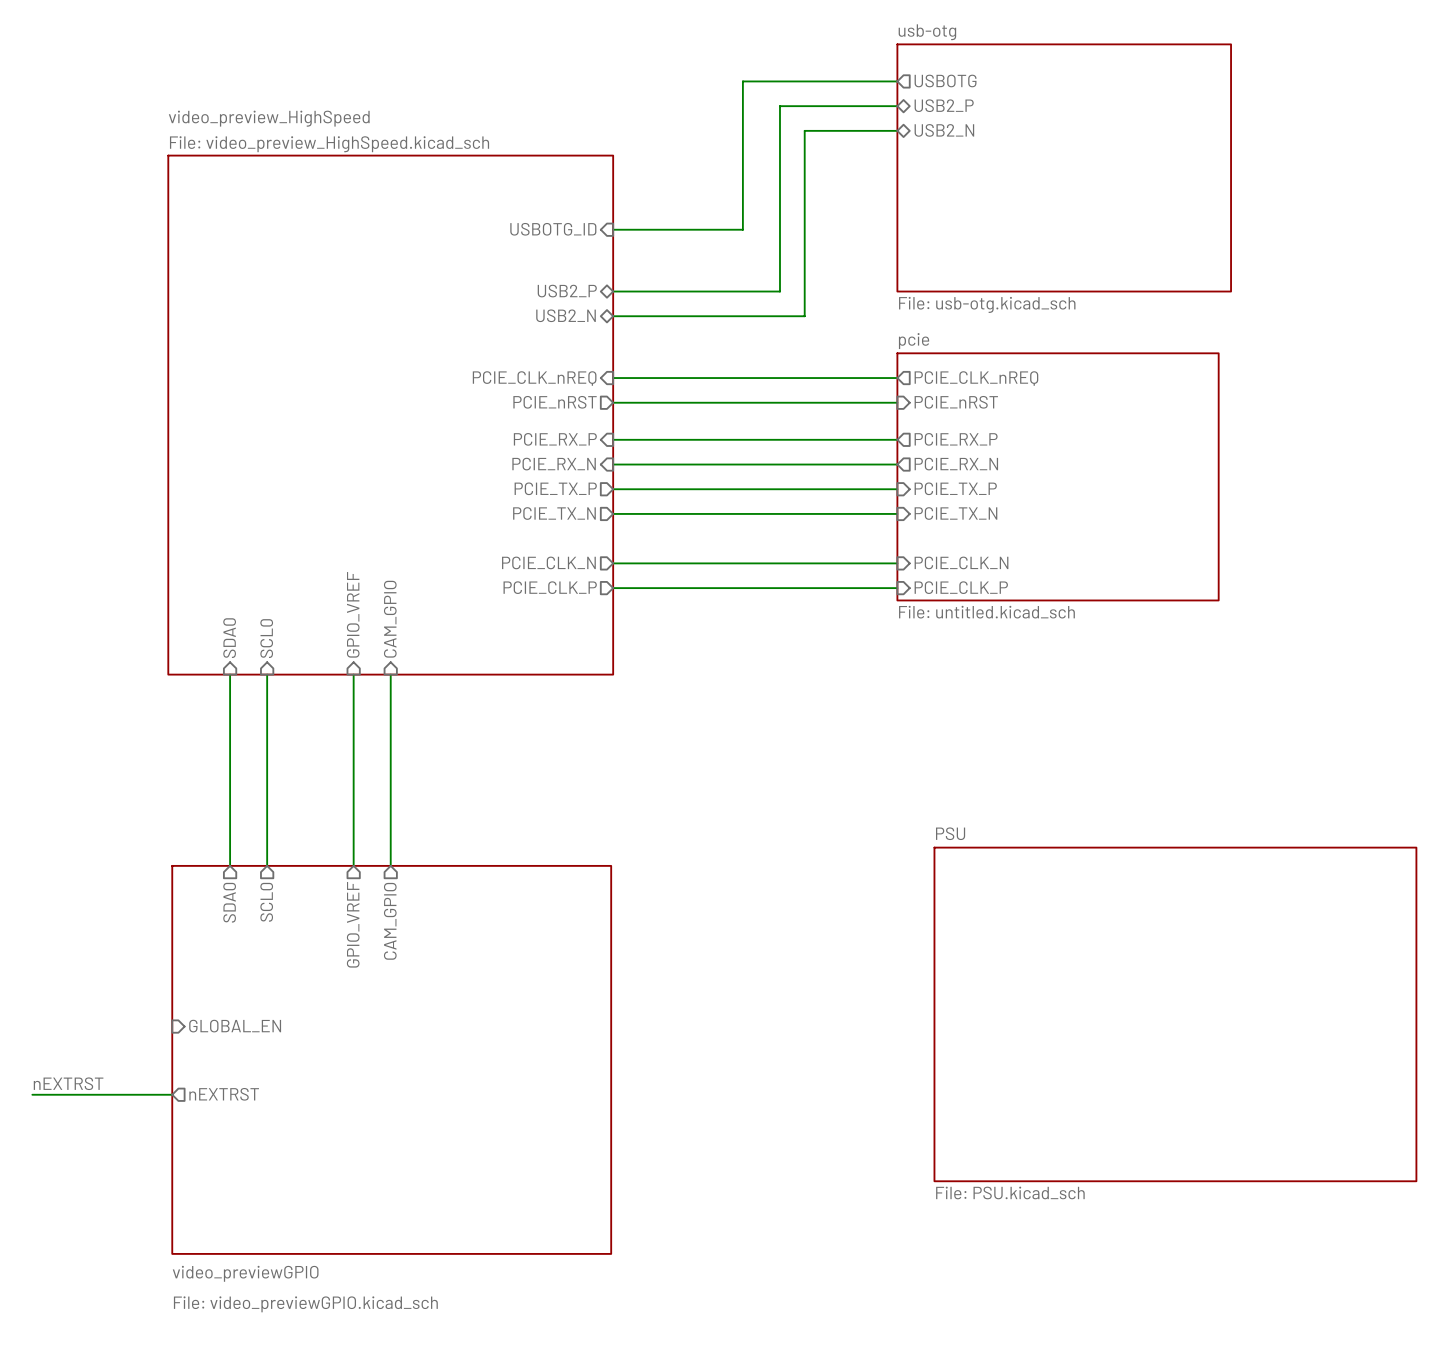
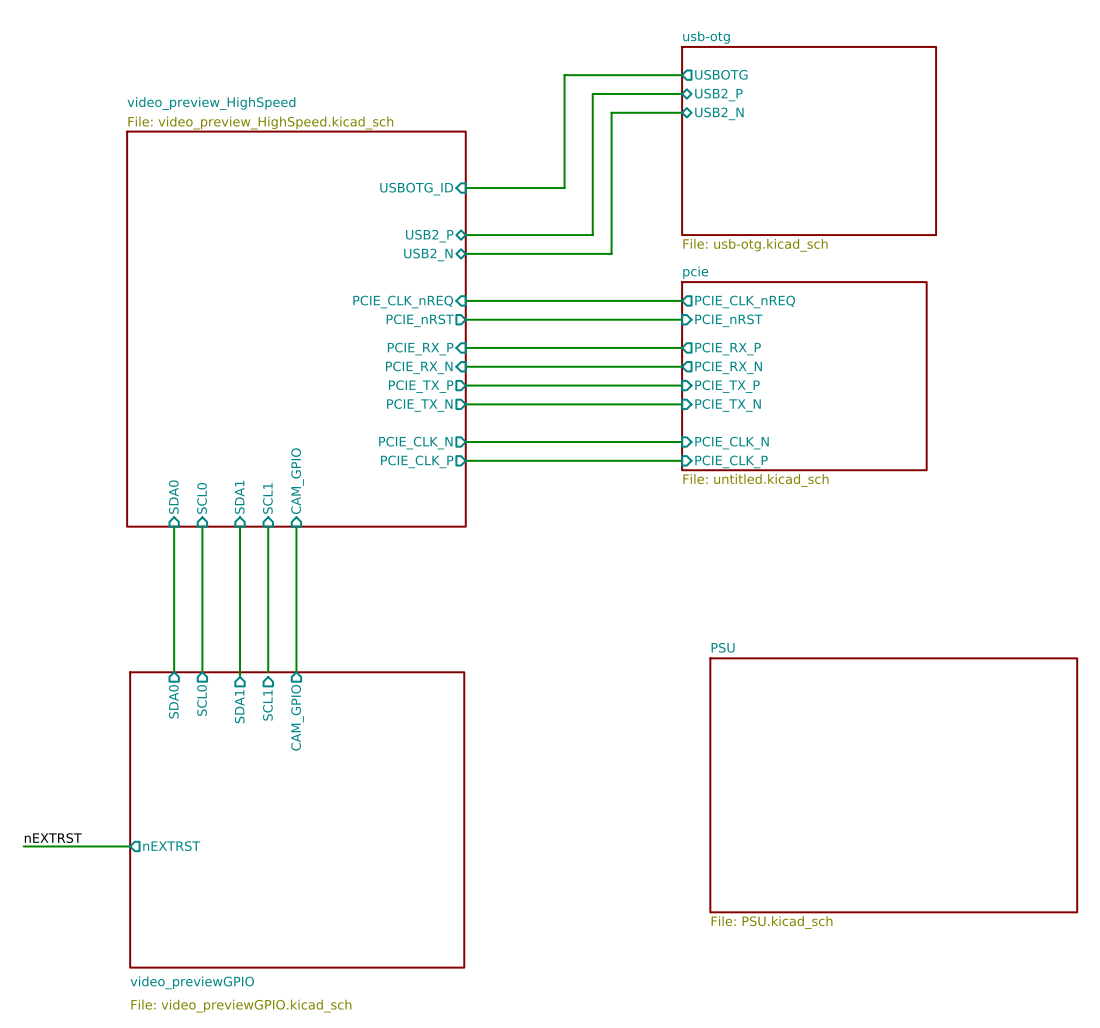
sheet pin: GPIO_VREF (353, 614) -> SCL1 (267, 498)
sheet pin: none -> SDA1 (239, 497)
wire: none -> (240, 526) (240, 677)
sheet pin: none -> SDA1 (239, 706)
sheet pin: GPIO_VREF (353, 924) -> SCL1 (267, 705)
sheet pin: GLOBAL_EN (235, 1026) -> none

